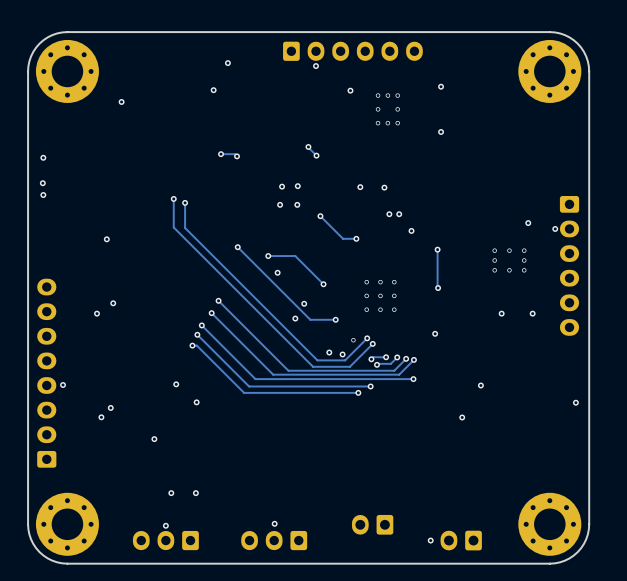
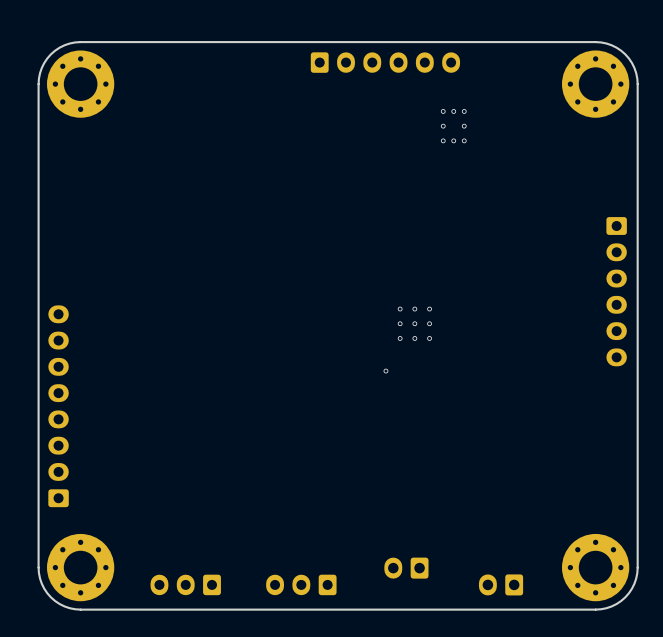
via: (227, 63) -> none
via: (316, 66) -> none
via: (441, 86) -> none
via: (213, 90) -> none
via: (350, 90) -> none
via: (378, 95) -> none
via: (387, 95) -> none
via: (397, 95) -> none
via: none -> (443, 111)
via: none -> (453, 111)
via: none -> (464, 111)
via: (121, 101) -> none
via: (378, 109) -> none
via: (397, 109) -> none
via: none -> (443, 126)
via: none -> (464, 126)
via: (378, 123) -> none
via: (387, 123) -> none
via: (397, 123) -> none
via: none -> (443, 140)
via: none -> (453, 140)
via: none -> (464, 140)
via: (441, 132) -> none
track: (308, 146) (316, 155) -> none
via: (308, 146) -> none
track: (221, 154) (234, 154) (237, 156) -> none
via: (221, 154) -> none
via: (316, 155) -> none
via: (237, 156) -> none
via: (43, 157) -> none
via: (42, 183) -> none
via: (282, 186) -> none
via: (297, 186) -> none
via: (360, 187) -> none
via: (384, 187) -> none
via: (43, 195) -> none
track: (173, 198) (173, 227) (313, 366) (349, 366) (372, 343) -> none
via: (173, 198) -> none
track: (185, 202) (185, 227) (317, 360) (345, 360) (367, 338) -> none
via: (185, 202) -> none
via: (280, 204) -> none
via: (297, 204) -> none
via: (389, 214) -> none
via: (399, 214) -> none
track: (320, 216) (343, 238) (356, 238) -> none
via: (320, 216) -> none
via: (528, 223) -> none
via: (555, 228) -> none
via: (411, 230) -> none
via: (356, 238) -> none
via: (106, 239) -> none
track: (237, 247) (310, 319) (335, 319) -> none
via: (237, 247) -> none
track: (437, 249) (438, 288) -> none
via: (437, 249) -> none
via: (494, 250) -> none
via: (509, 250) -> none
via: (524, 250) -> none
track: (268, 256) (295, 256) (323, 284) -> none
via: (268, 256) -> none
via: (494, 260) -> none
via: (524, 260) -> none
via: (494, 270) -> none
via: (509, 270) -> none
via: (524, 270) -> none
via: (277, 272) -> none
via: (323, 284) -> none
via: (438, 288) -> none
track: (218, 300) (288, 370) (394, 370) (406, 358) -> none
via: (218, 300) -> none
via: (113, 303) -> none
via: (304, 303) -> none
via: (96, 313) -> none
track: (211, 313) (273, 374) (399, 374) (413, 359) -> none
via: (211, 313) -> none
via: (501, 313) -> none
via: (532, 313) -> none
via: (295, 318) -> none
via: (335, 319) -> none
track: (201, 325) (255, 379) (413, 379) -> none
via: (201, 325) -> none
via: (435, 333) -> none
track: (197, 334) (249, 386) (370, 386) -> none
via: (197, 334) -> none
via: (367, 338) -> none
via: (372, 343) -> none
track: (192, 345) (196, 345) (244, 392) (358, 392) -> none
via: (192, 345) -> none
via: (329, 352) -> none
via: (342, 354) -> none
track: (386, 357) (373, 357) (371, 359) -> none
via: (386, 357) -> none
track: (397, 357) (390, 363) (376, 364) -> none
via: (397, 357) -> none
via: (406, 358) -> none
via: (371, 359) -> none
via: (413, 359) -> none
via: (376, 364) -> none
via: (413, 379) -> none
via: (176, 384) -> none
via: (63, 385) -> none
via: (480, 385) -> none
via: (370, 386) -> none
via: (358, 392) -> none
via: (196, 402) -> none
via: (575, 402) -> none
via: (110, 407) -> none
via: (101, 417) -> none
via: (462, 417) -> none
via: (154, 439) -> none
via: (171, 493) -> none
via: (195, 493) -> none
via: (274, 523) -> none
via: (165, 525) -> none
via: (430, 540) -> none

